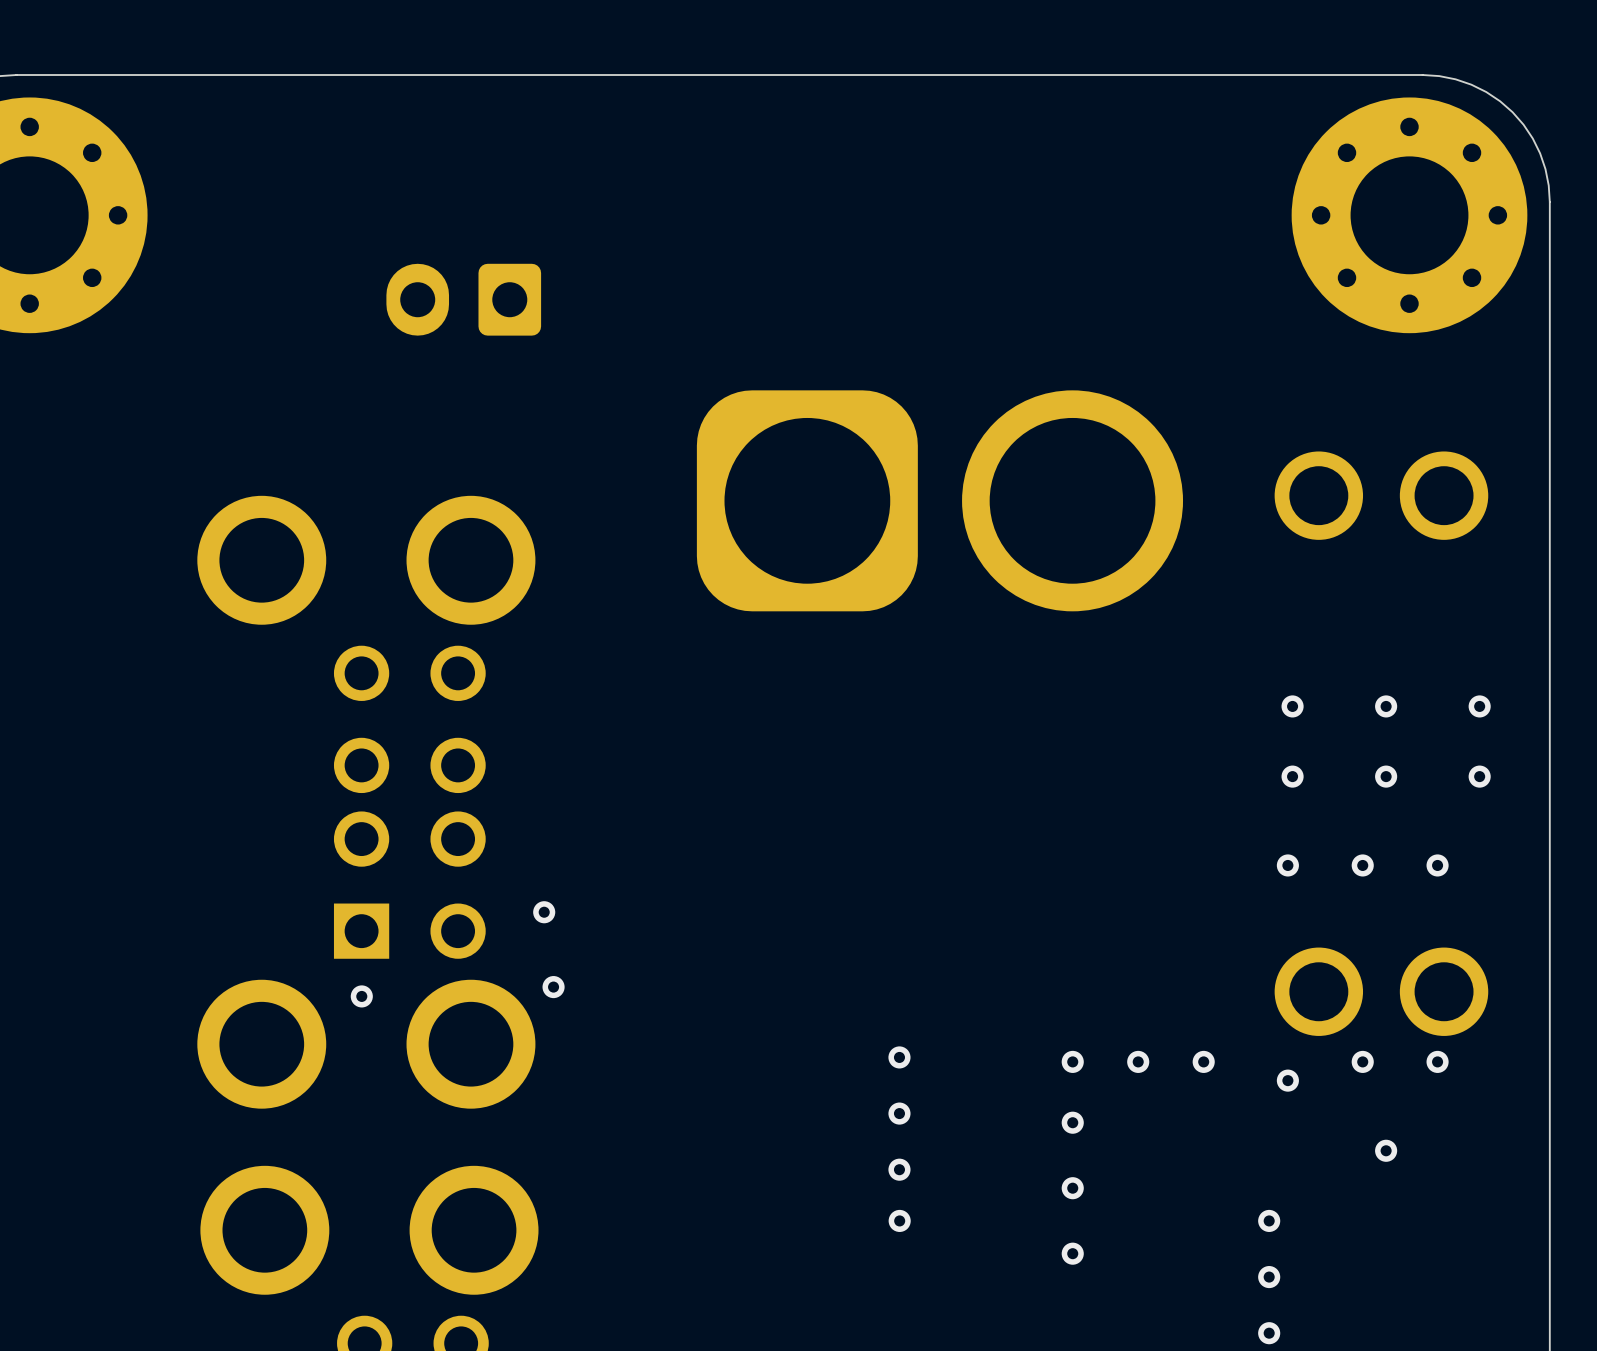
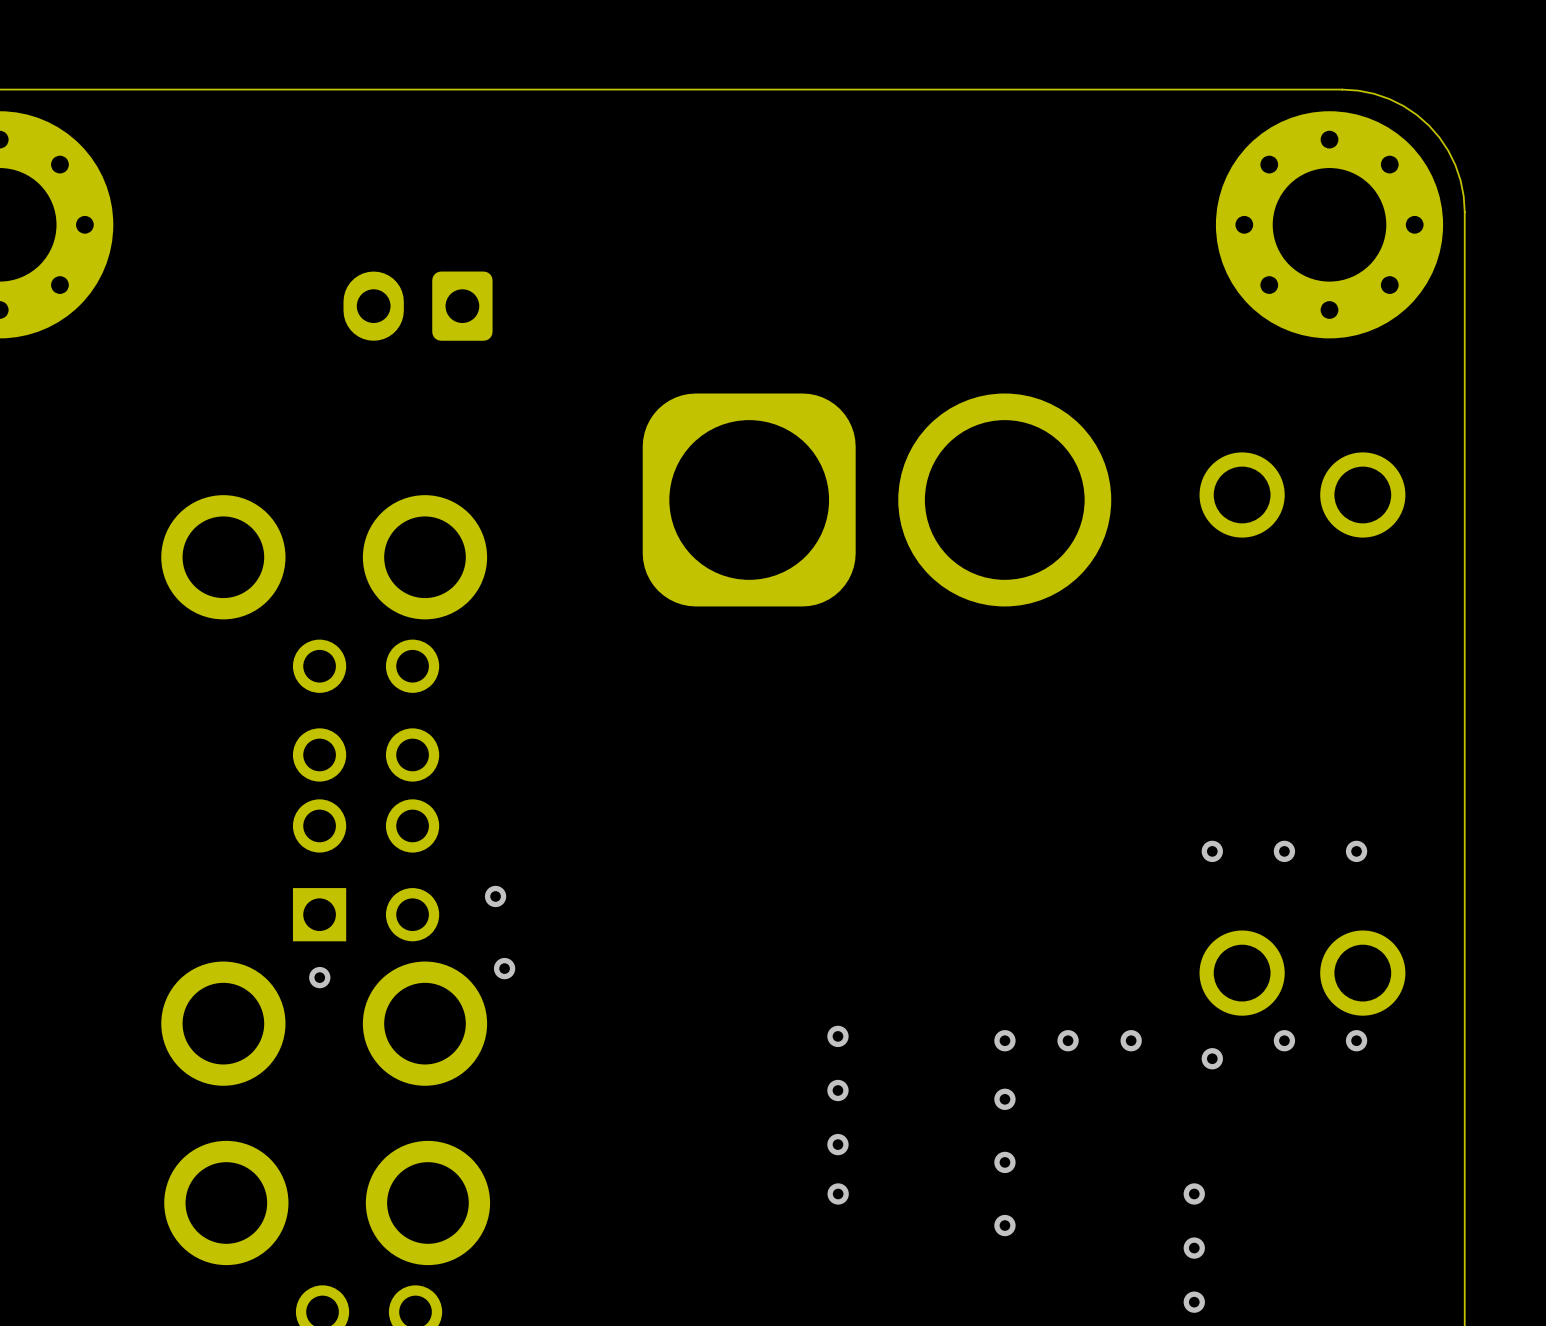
via: (1292, 706) -> none
via: (1386, 706) -> none
via: (1479, 706) -> none
via: (1292, 776) -> none
via: (1386, 776) -> none
via: (1479, 776) -> none
via: (1386, 1150) -> none

